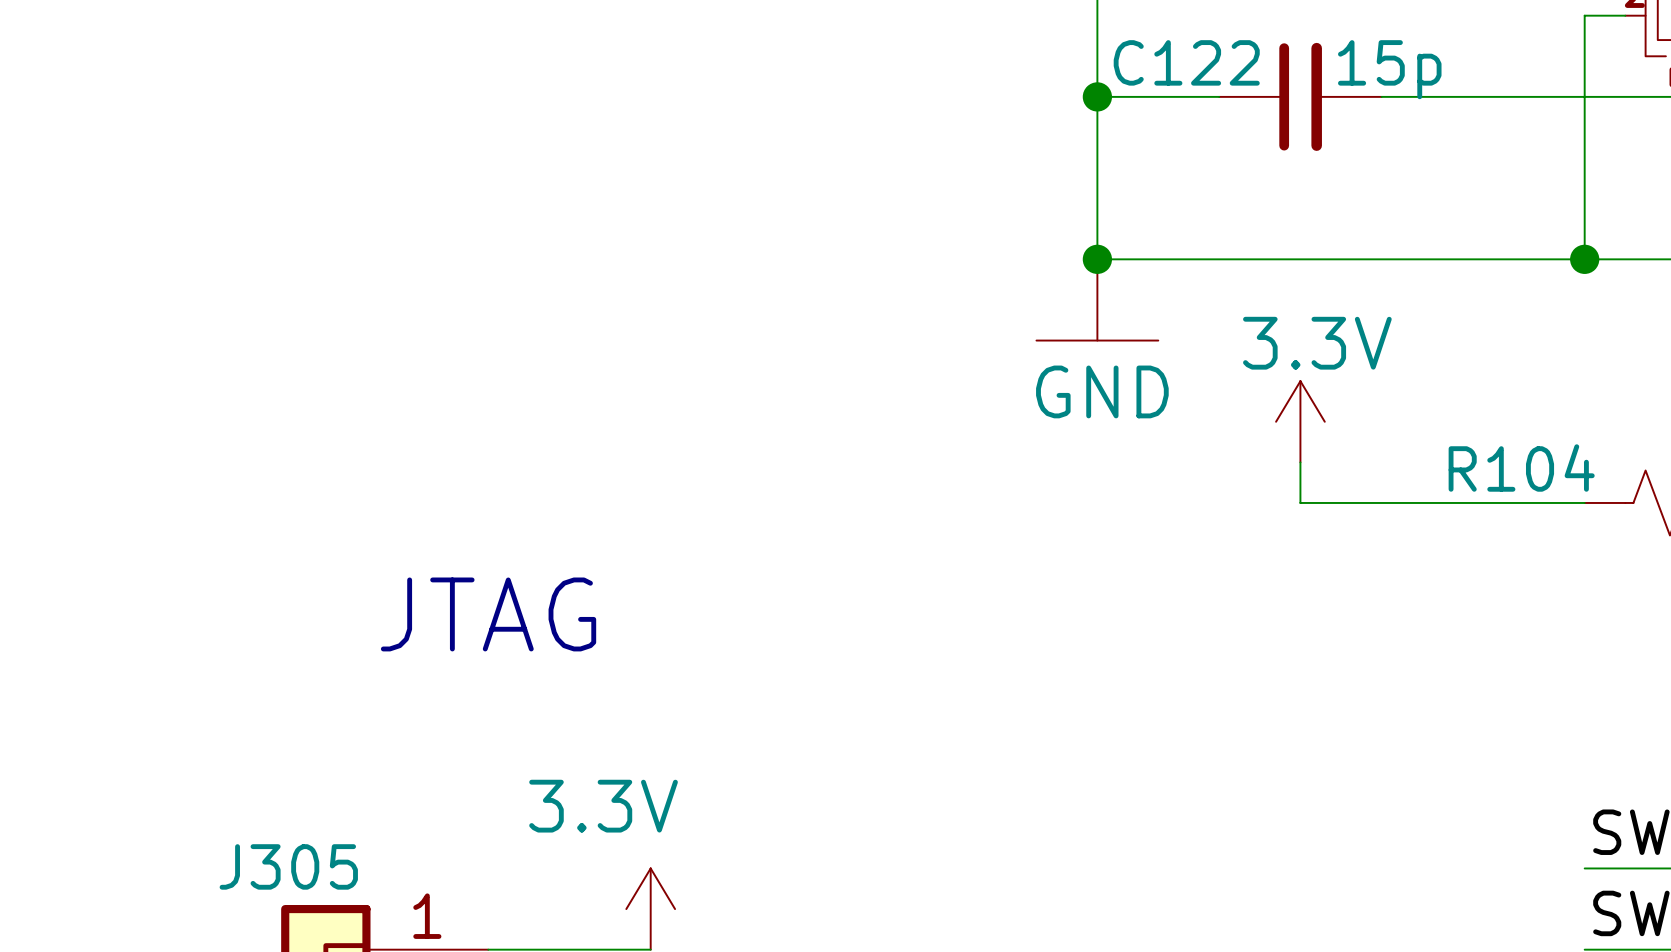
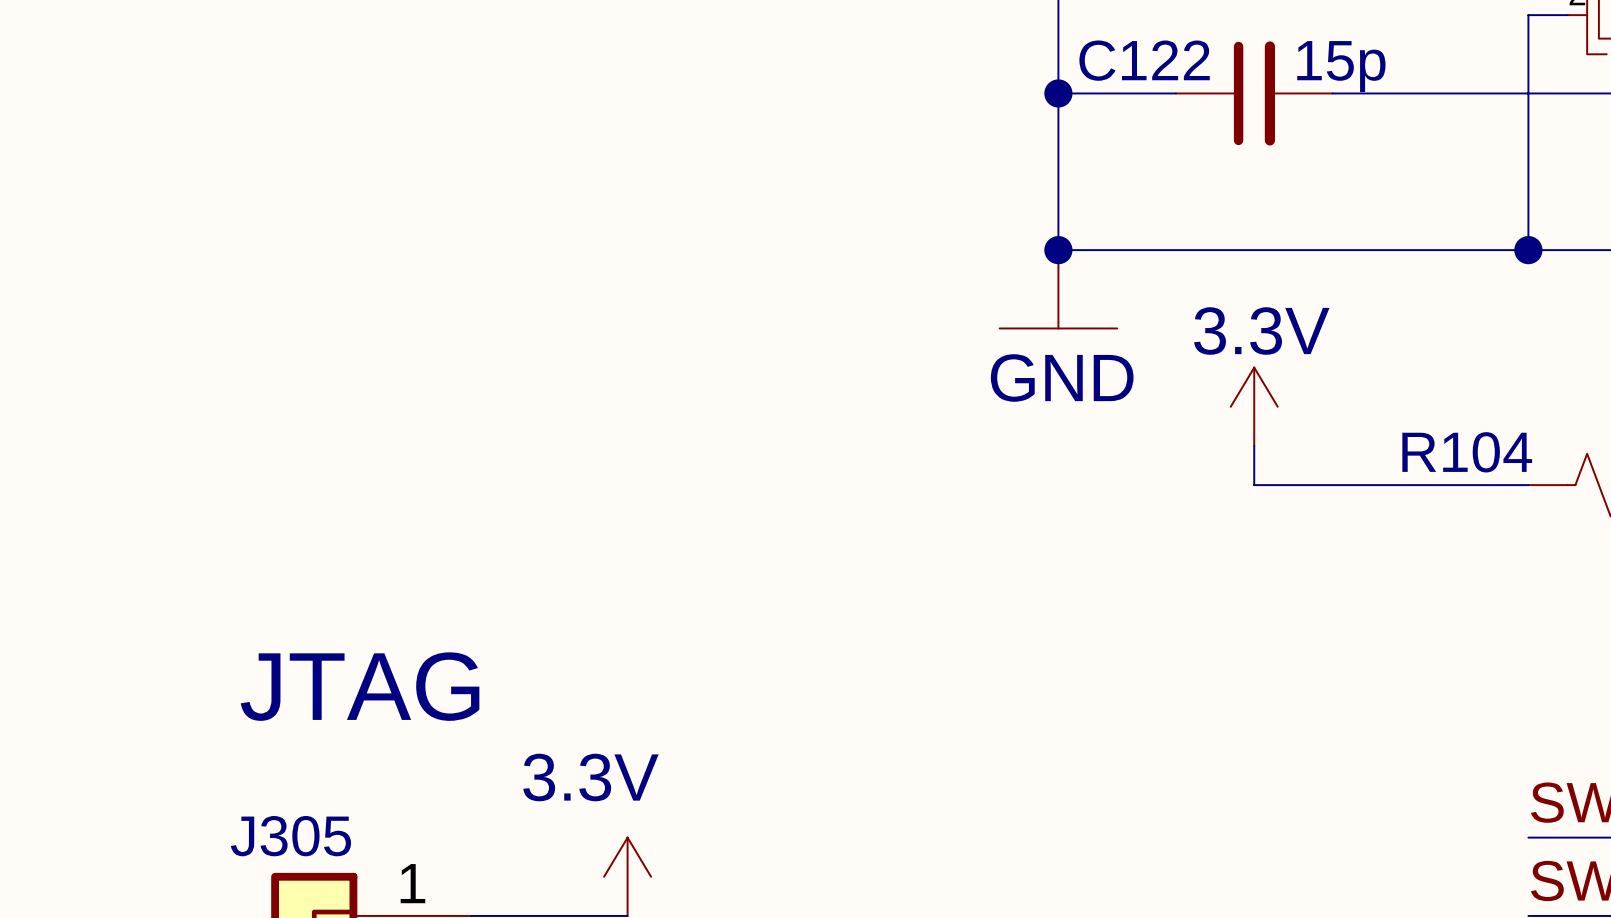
text position: JTAG (488, 614) -> JTAG (360, 686)

